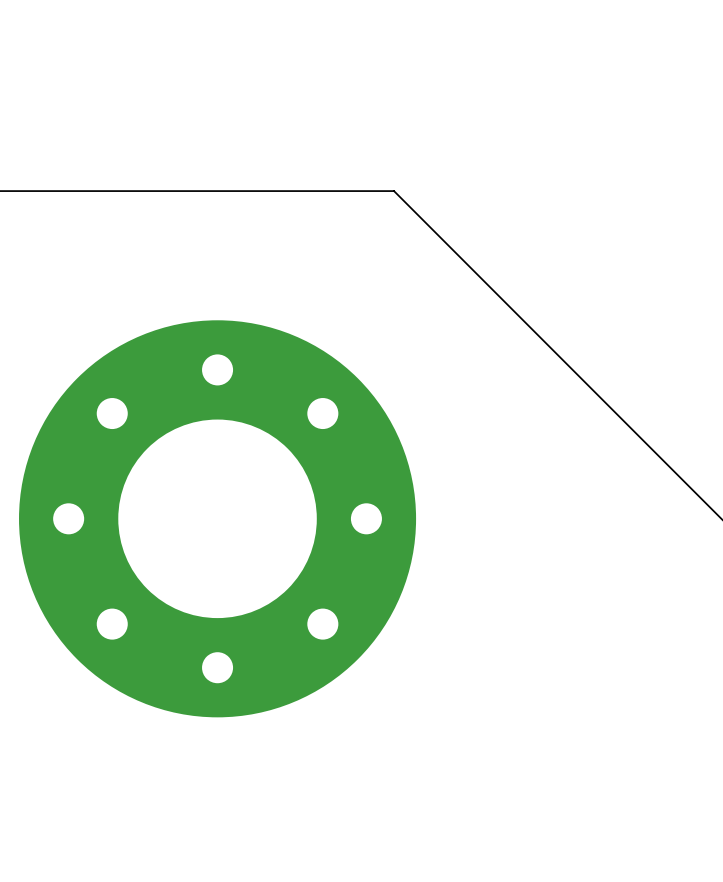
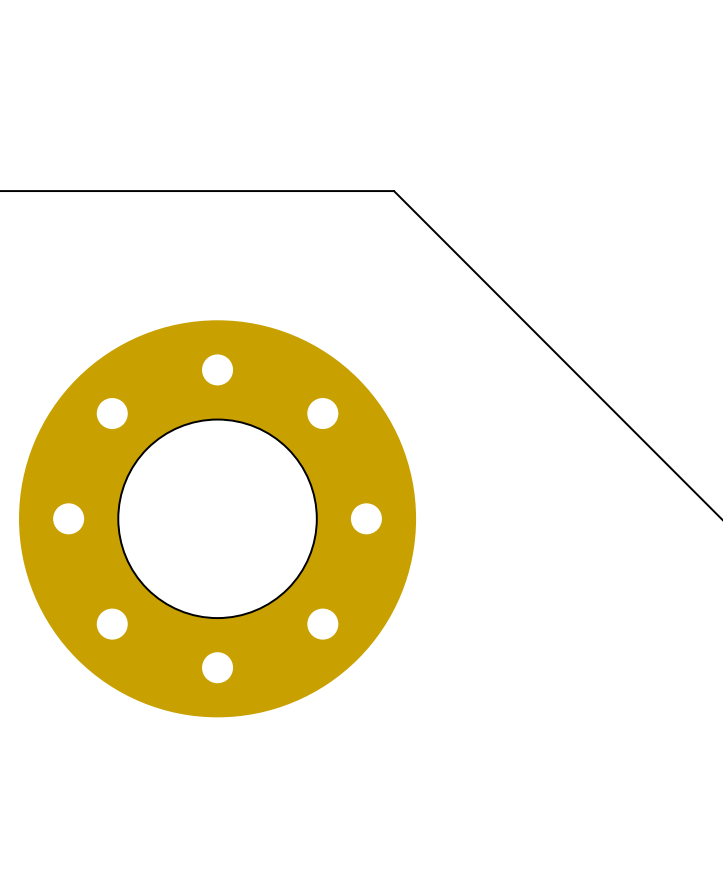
round board edge: none -> [117, 419, 318, 619]

